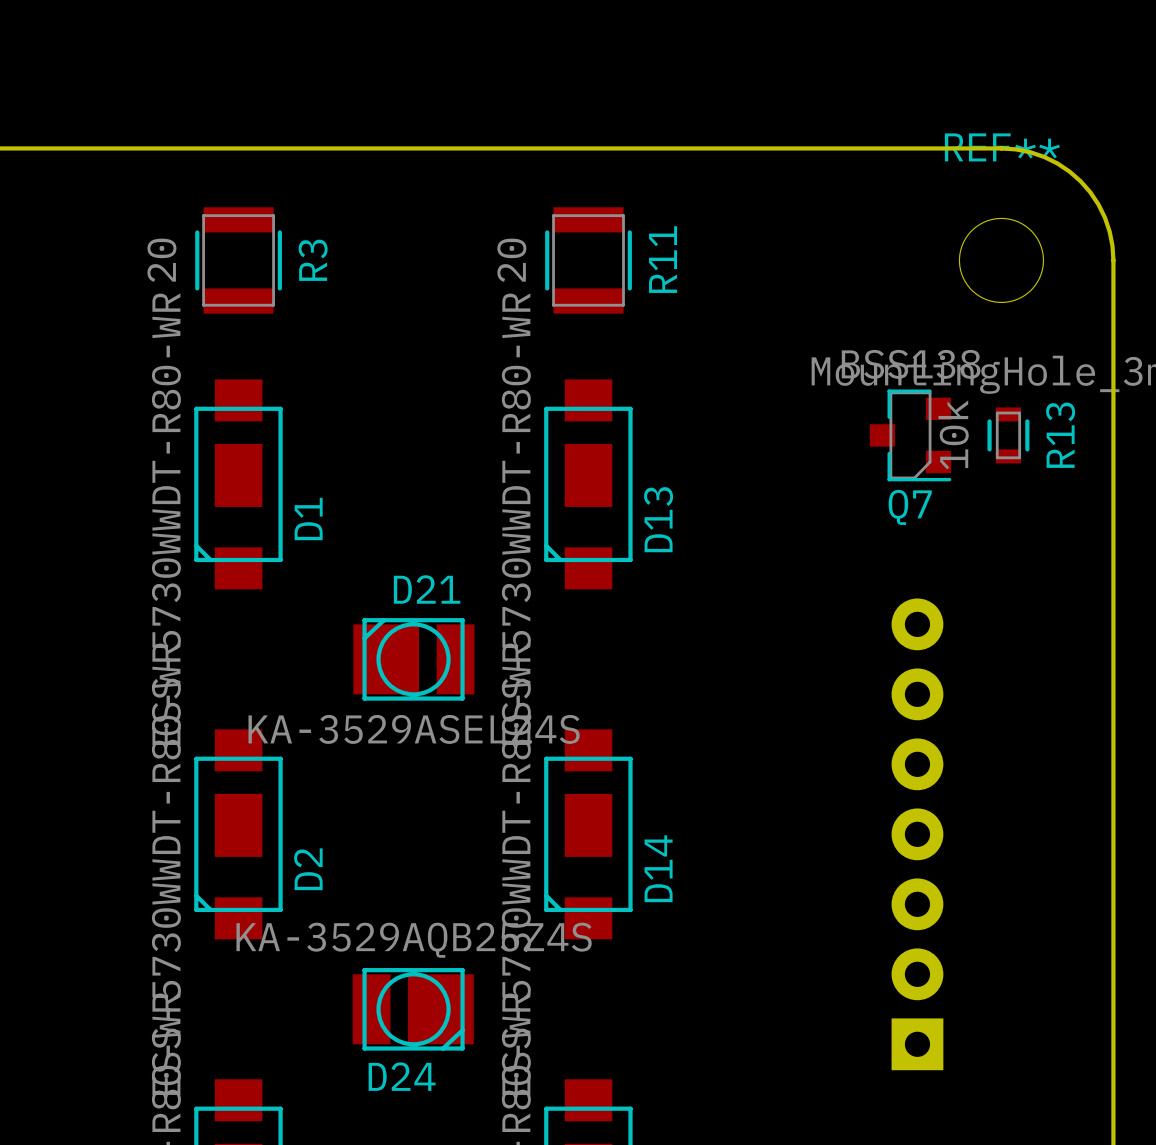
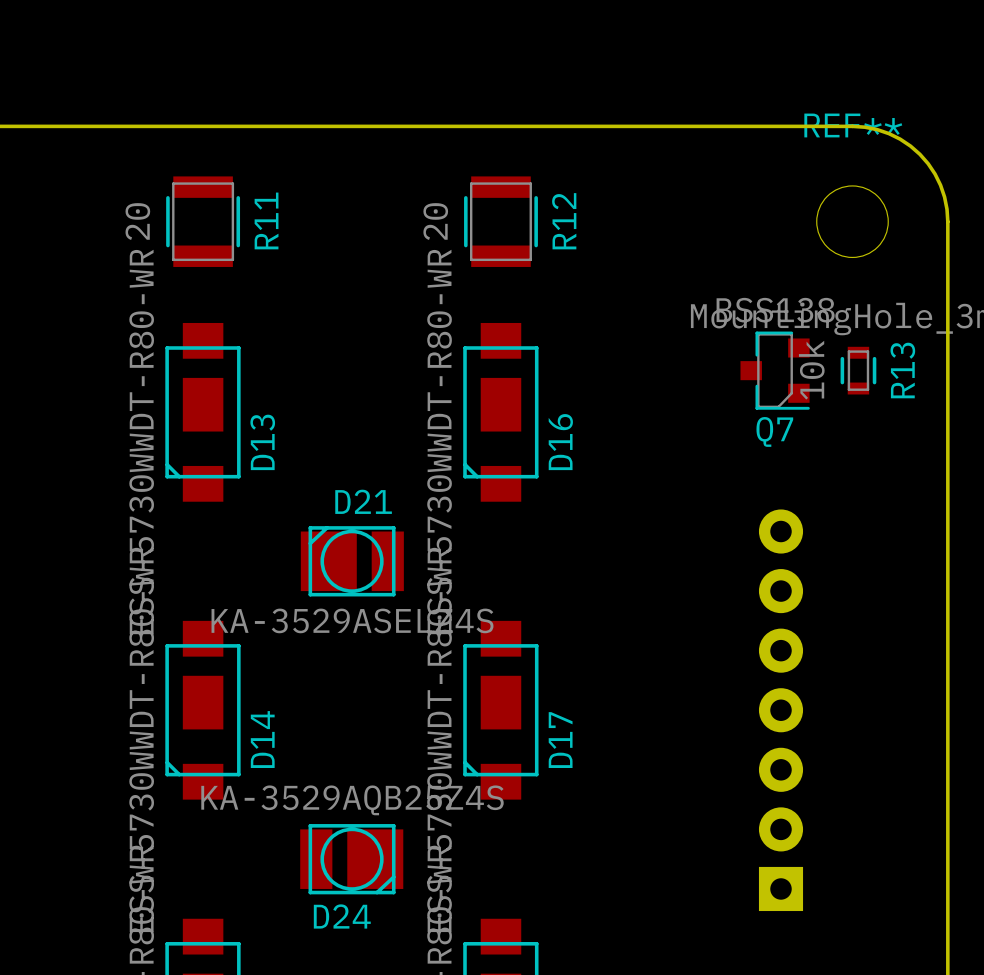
R11 name: R11 (663, 259) -> R12 (564, 221)
R3 name: R3 (313, 260) -> R11 (266, 220)
D1 name: D1 (308, 518) -> D13 (262, 442)
D13 name: D13 (658, 519) -> D16 (560, 442)
D14 name: D14 (658, 868) -> D17 (560, 740)
D2 name: D2 (308, 869) -> D14 (262, 739)

